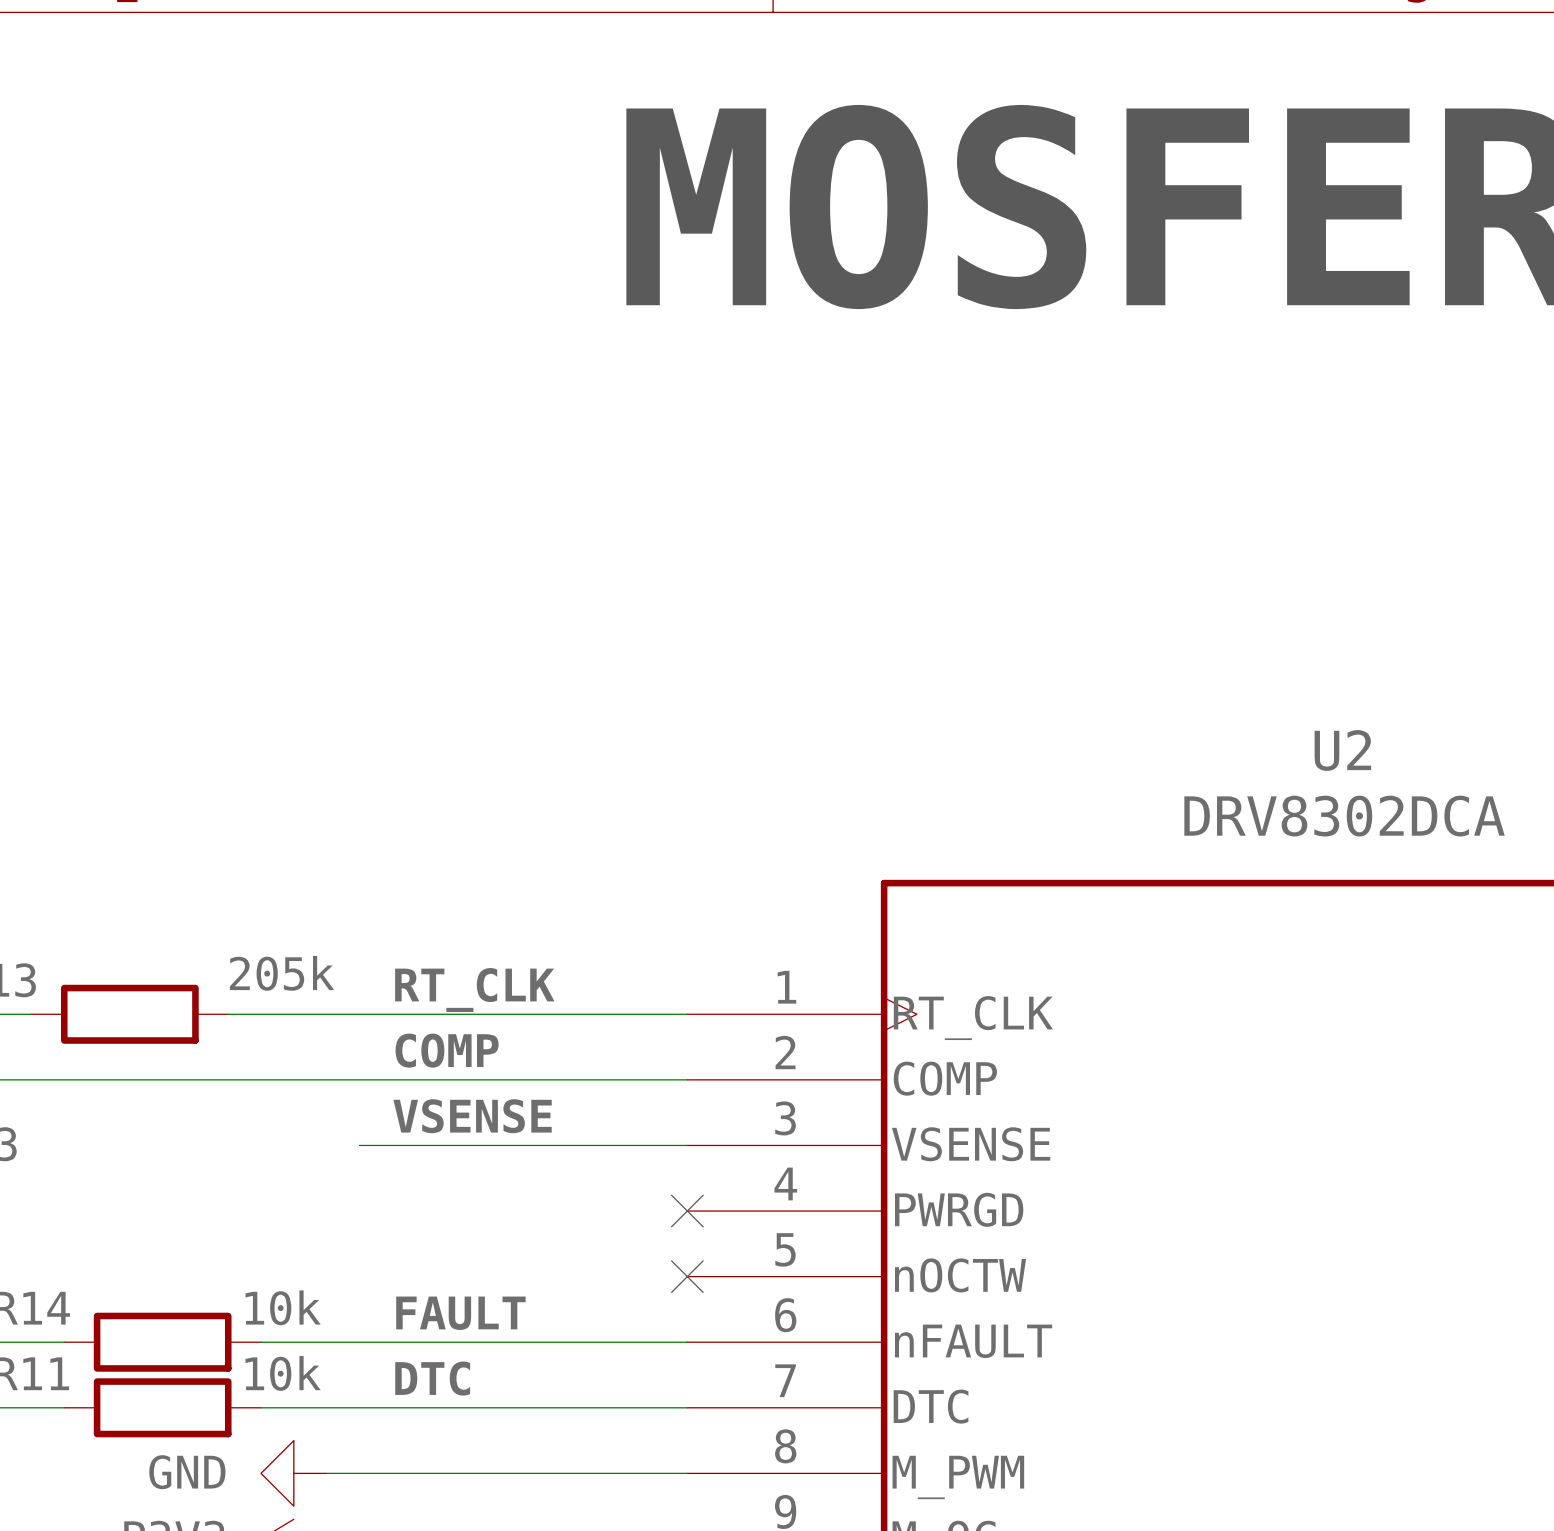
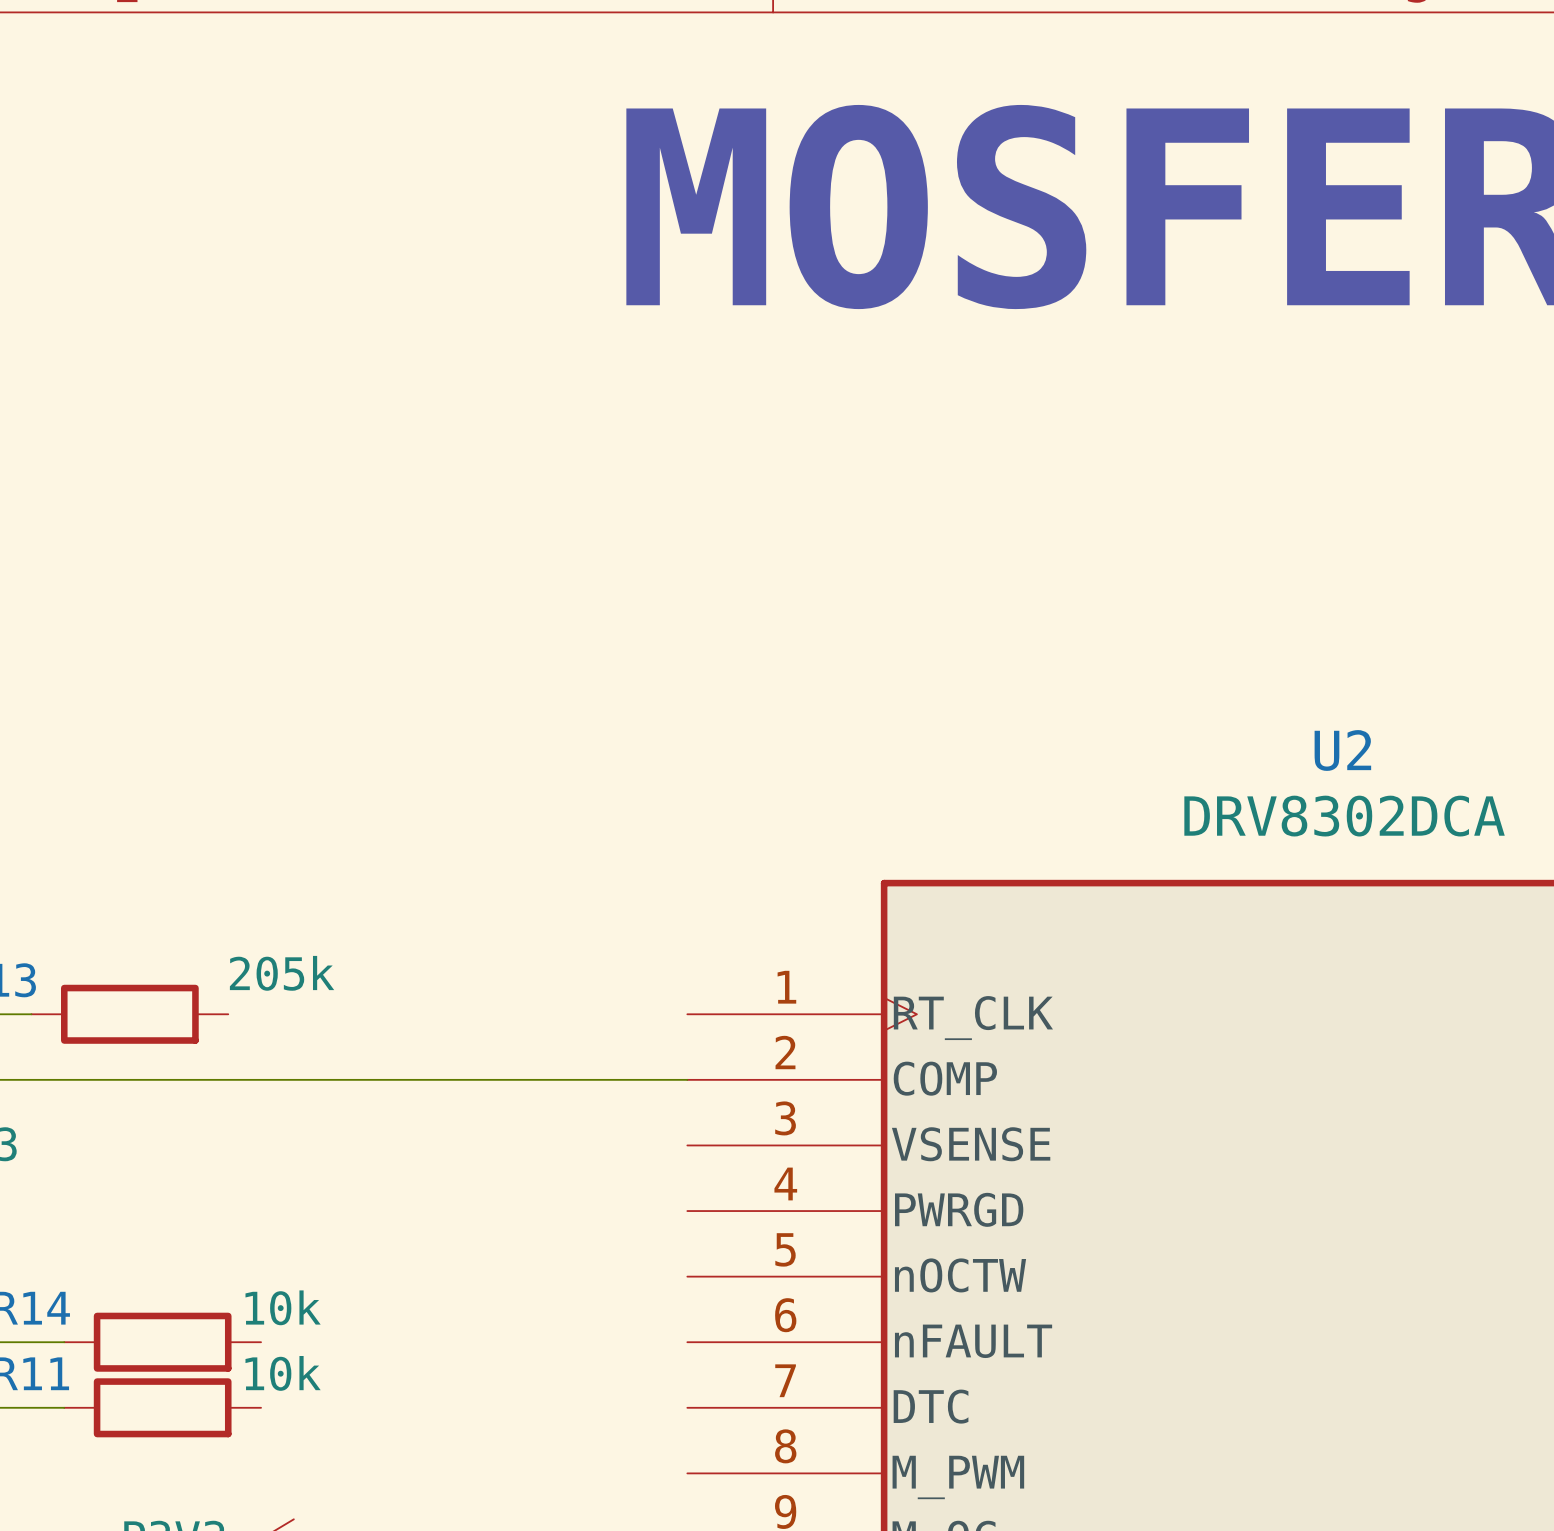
label: RT_CLK (474, 990) -> none
wire: (228, 1014) (687, 1014) -> none
label: COMP (447, 1050) -> none
label: VSENSE (472, 1116) -> none
wire: (359, 1145) (687, 1145) -> none
no-connect mark: (687, 1211) -> none
no-connect mark: (687, 1276) -> none
label: FAULT (460, 1313) -> none
wire: (261, 1342) (687, 1342) -> none
label: DTC (432, 1378) -> none
wire: (261, 1407) (687, 1407) -> none
power symbol: GND (293, 1473) -> none
wire: (326, 1473) (687, 1473) -> none

